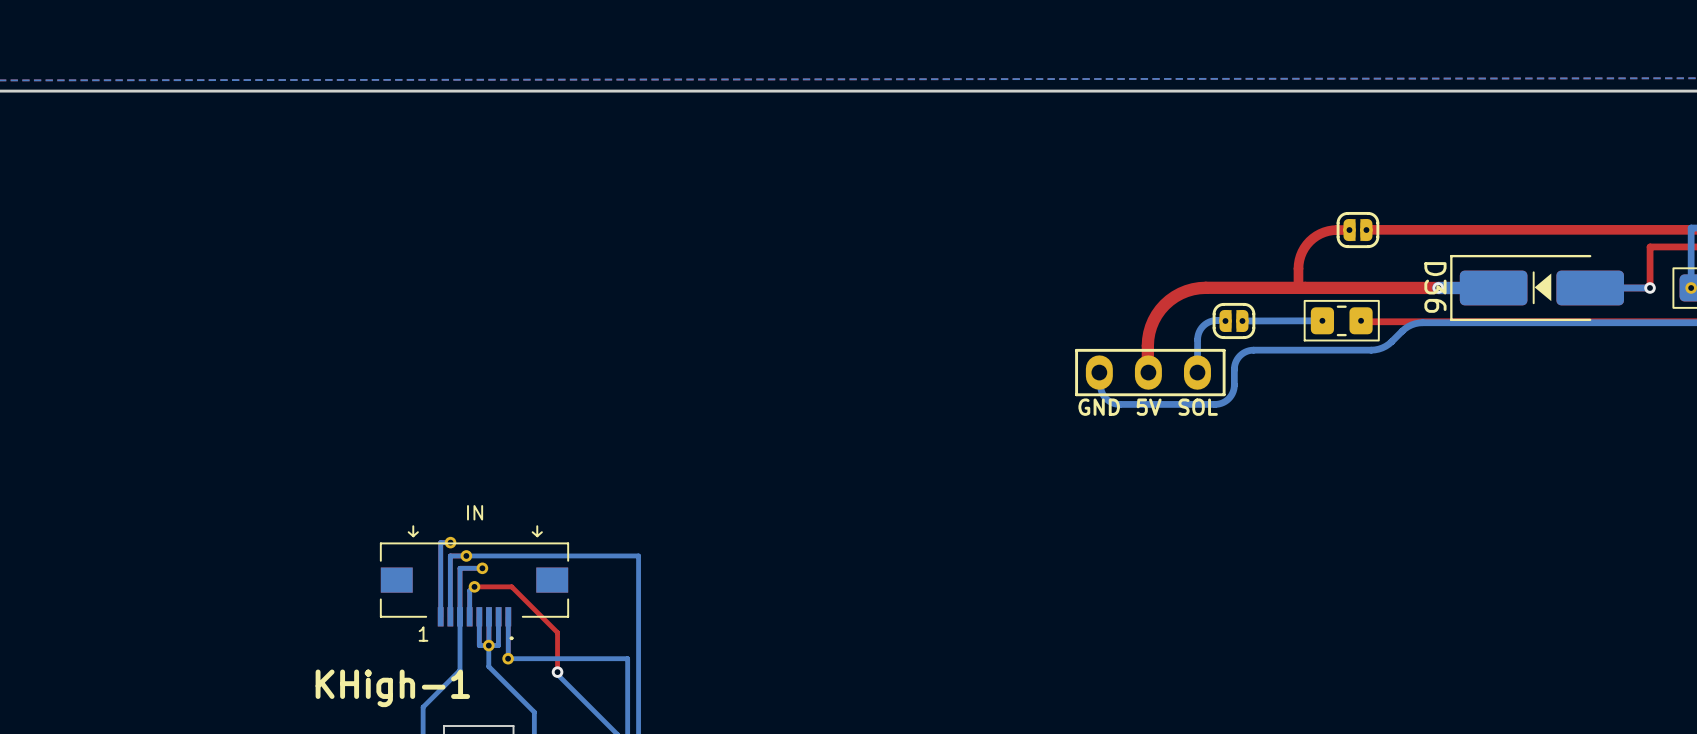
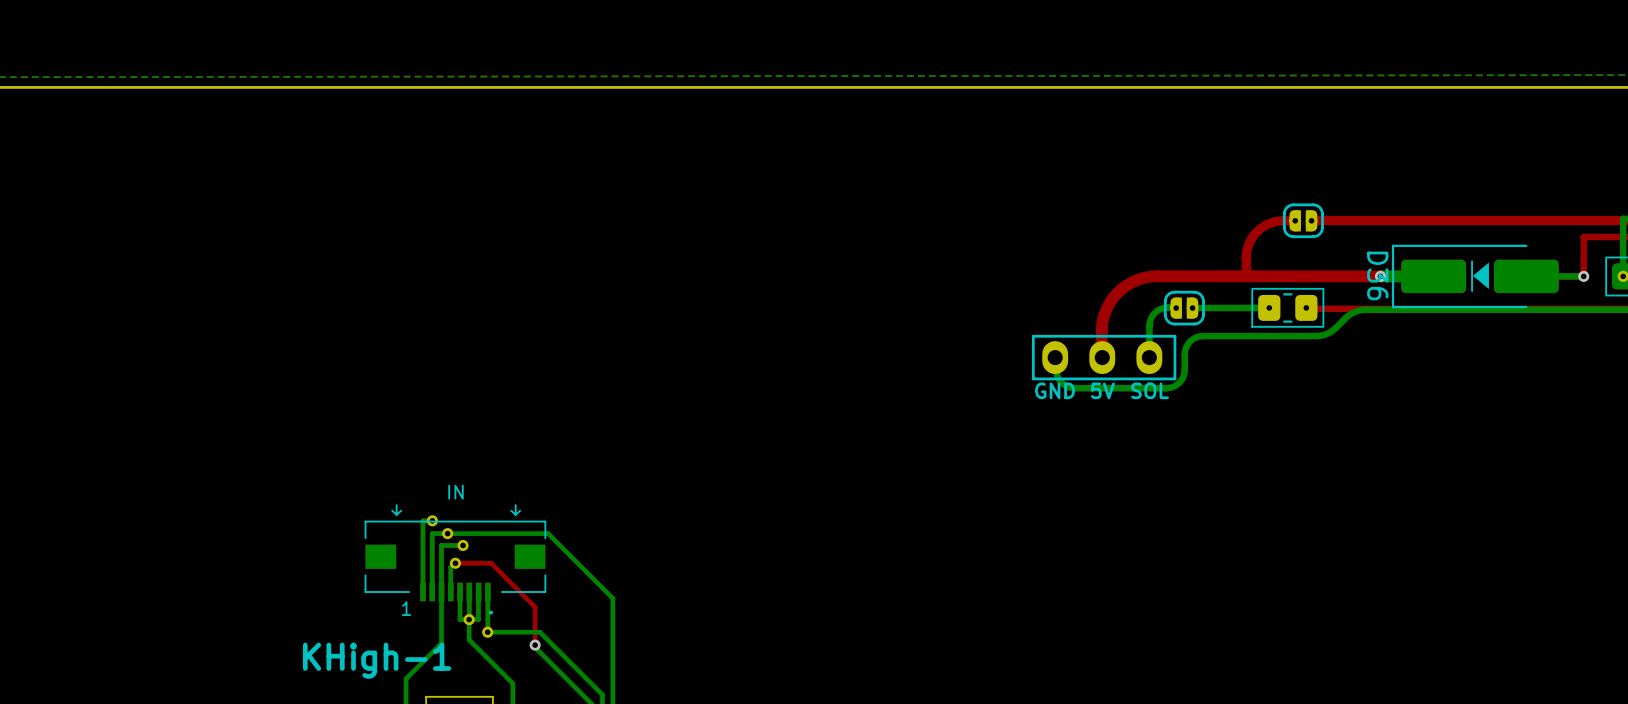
bottom track: (571, 555) (638, 555) (638, 623) -> (548, 533) (612, 598)
bottom track: (562, 658) (627, 658) (627, 723) -> (539, 632) (602, 694)

